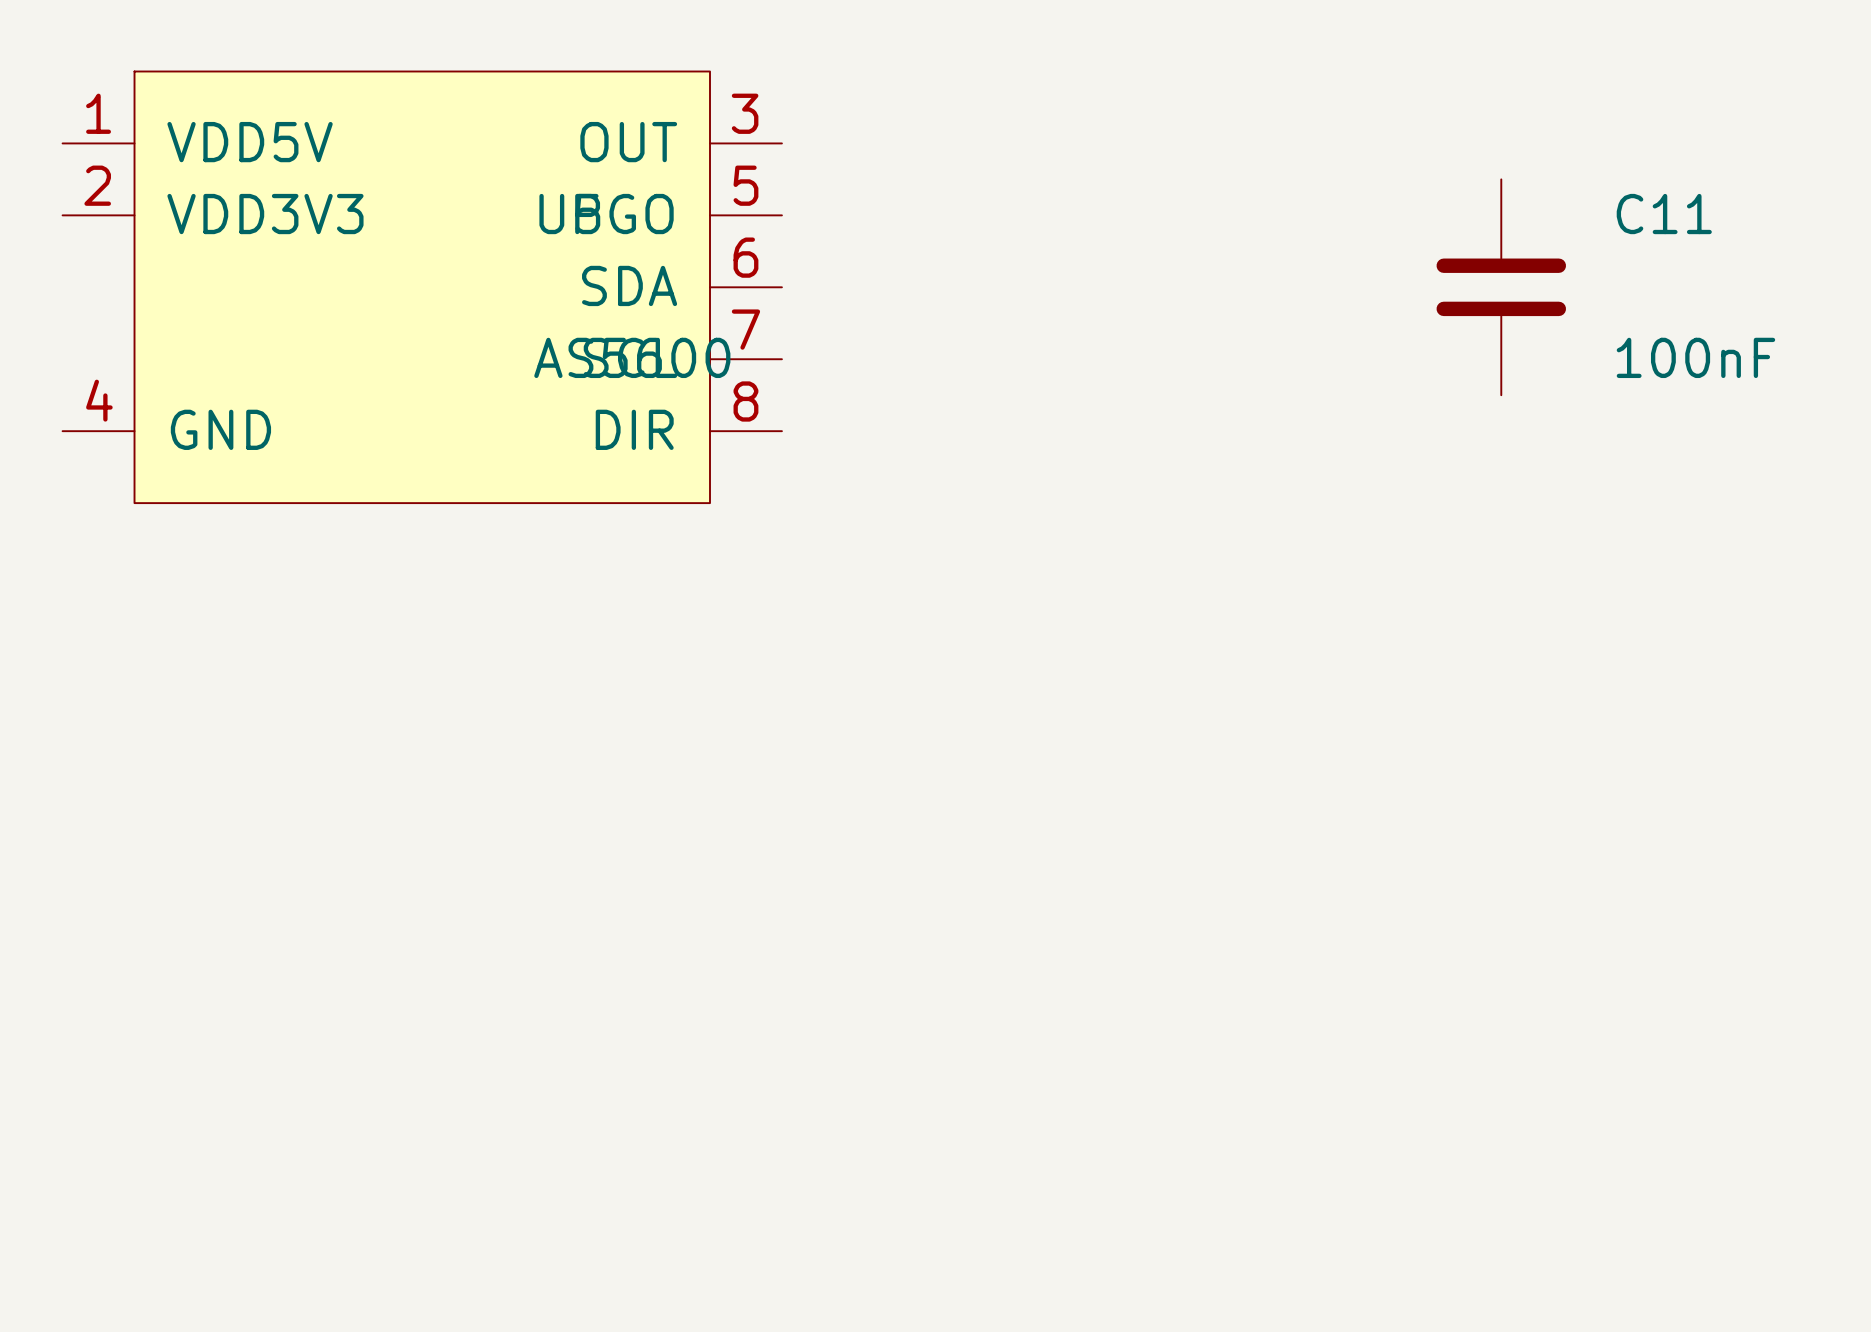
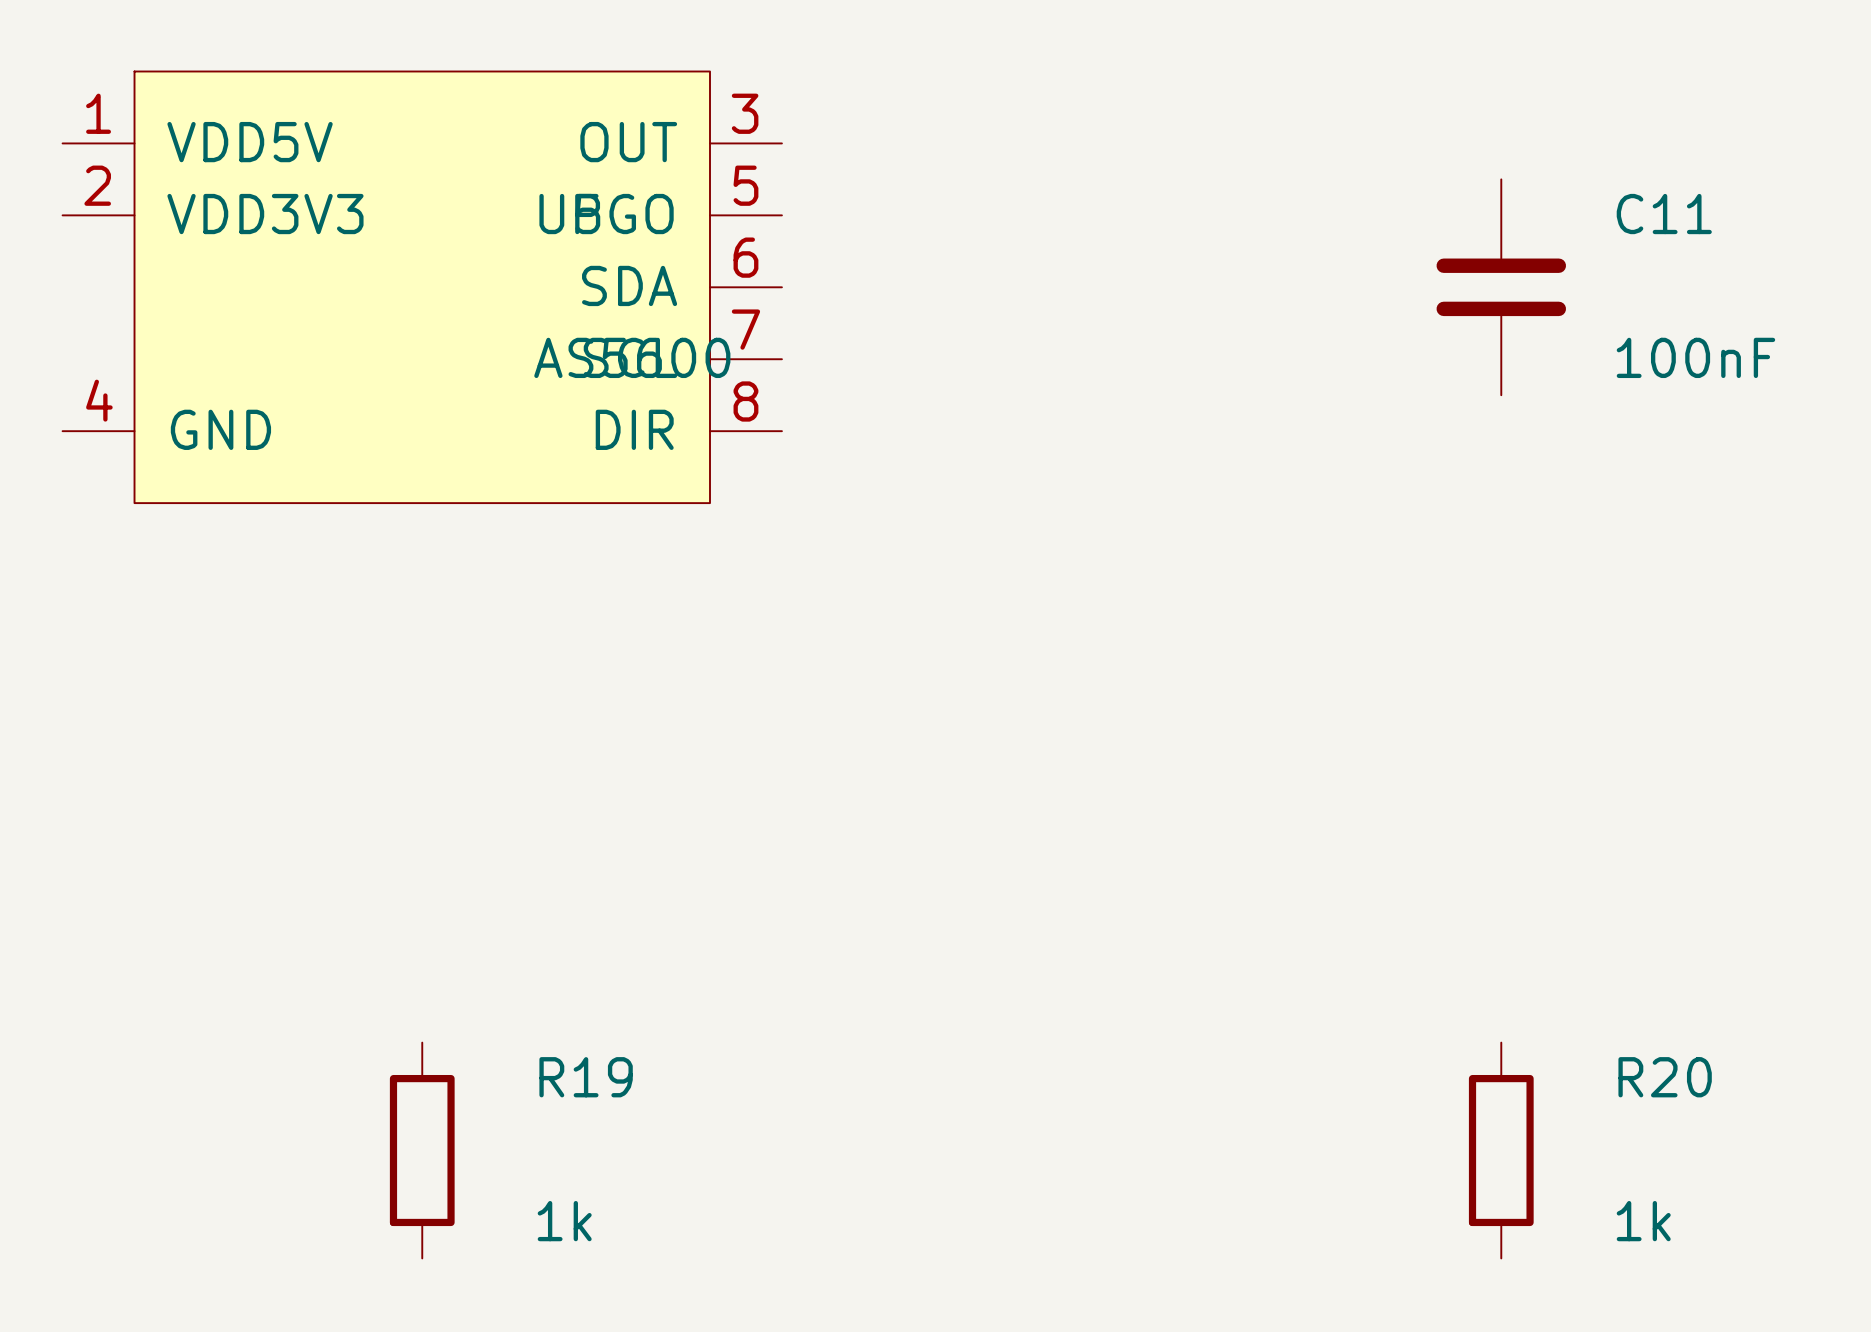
R19: none -> 1k (422, 1150)
R20: none -> 1k (1501, 1150)

